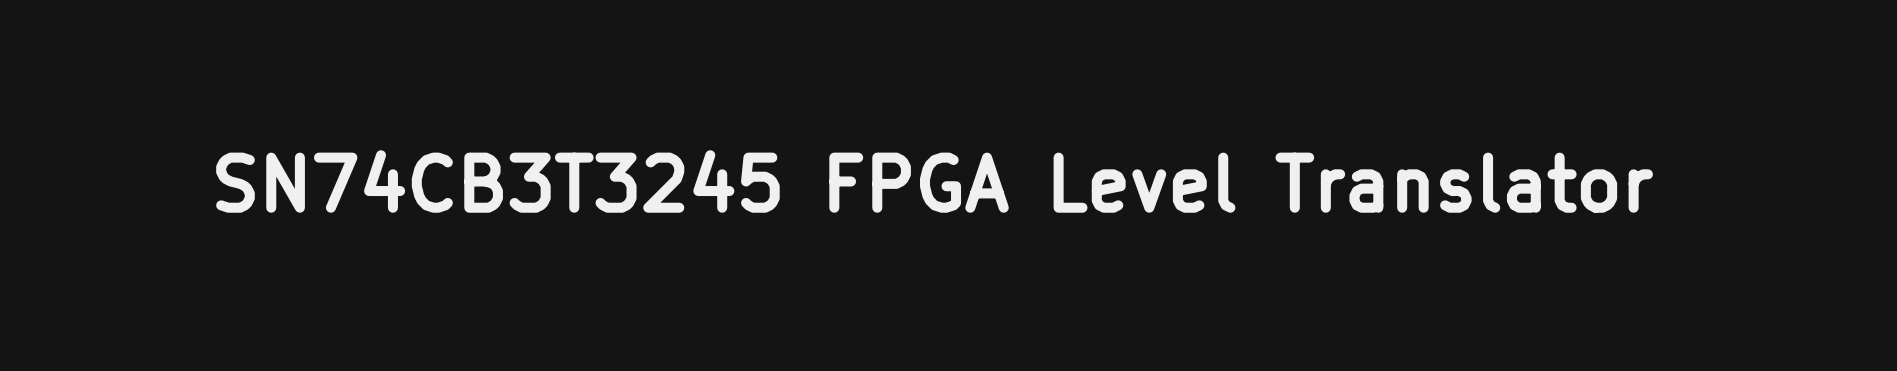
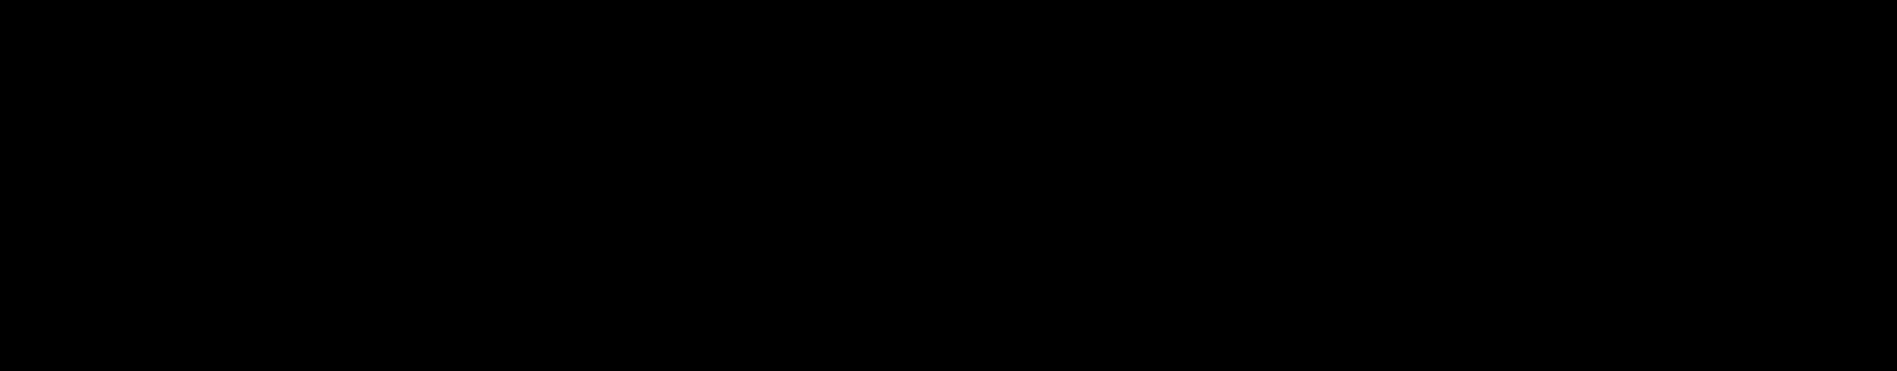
text: SN74CB3T3245 FPGA Level Translator (934, 181) -> none

